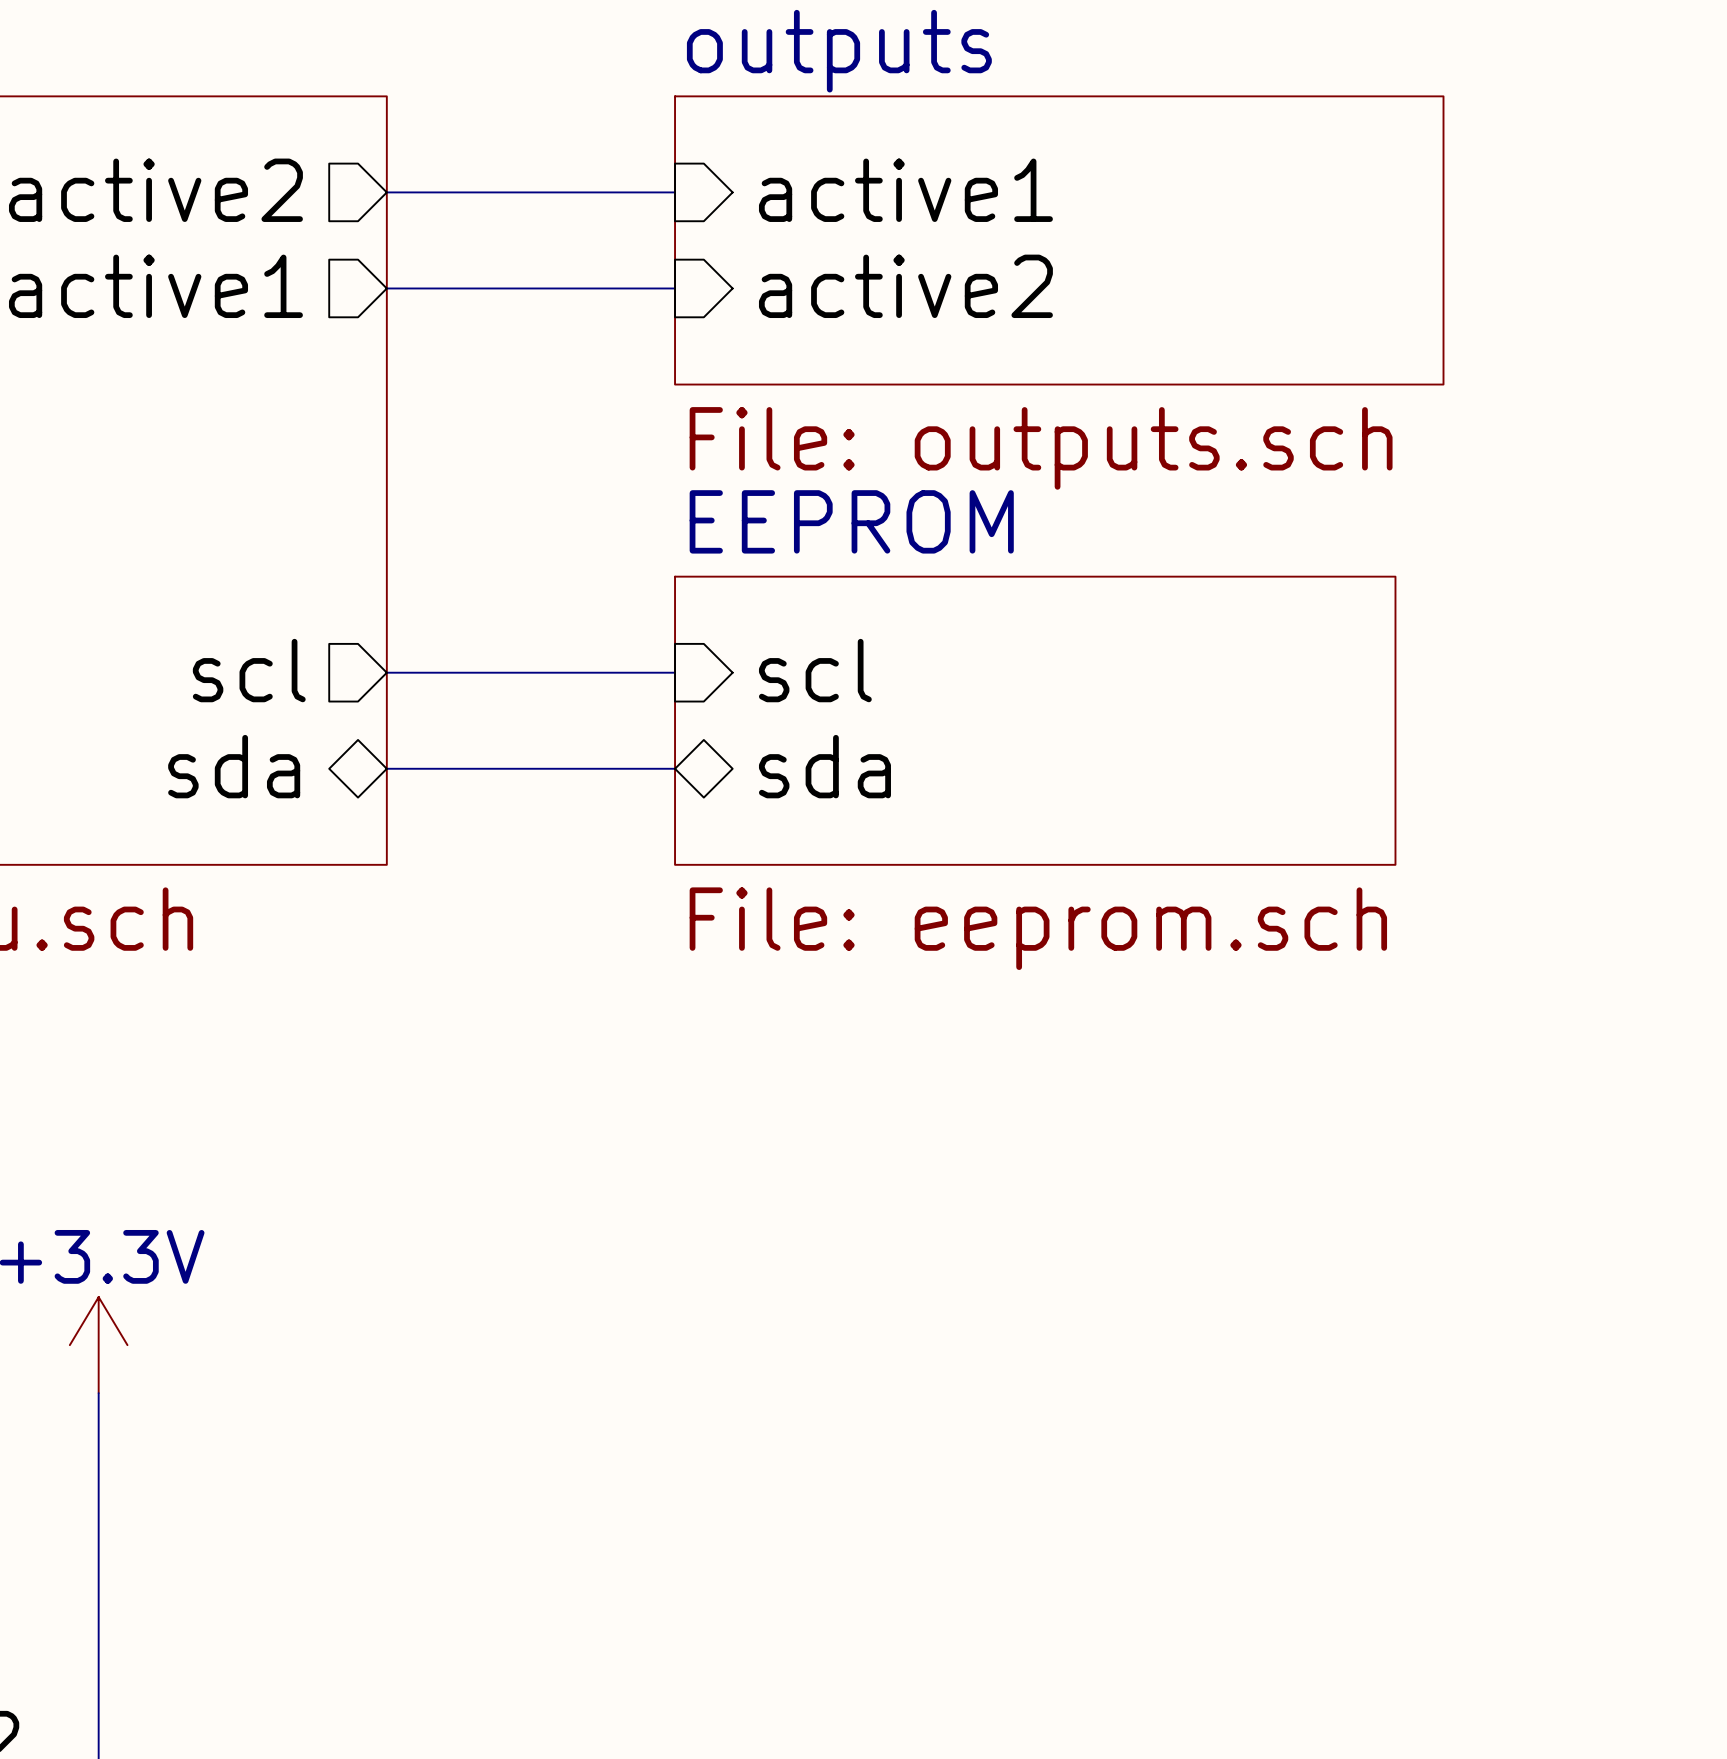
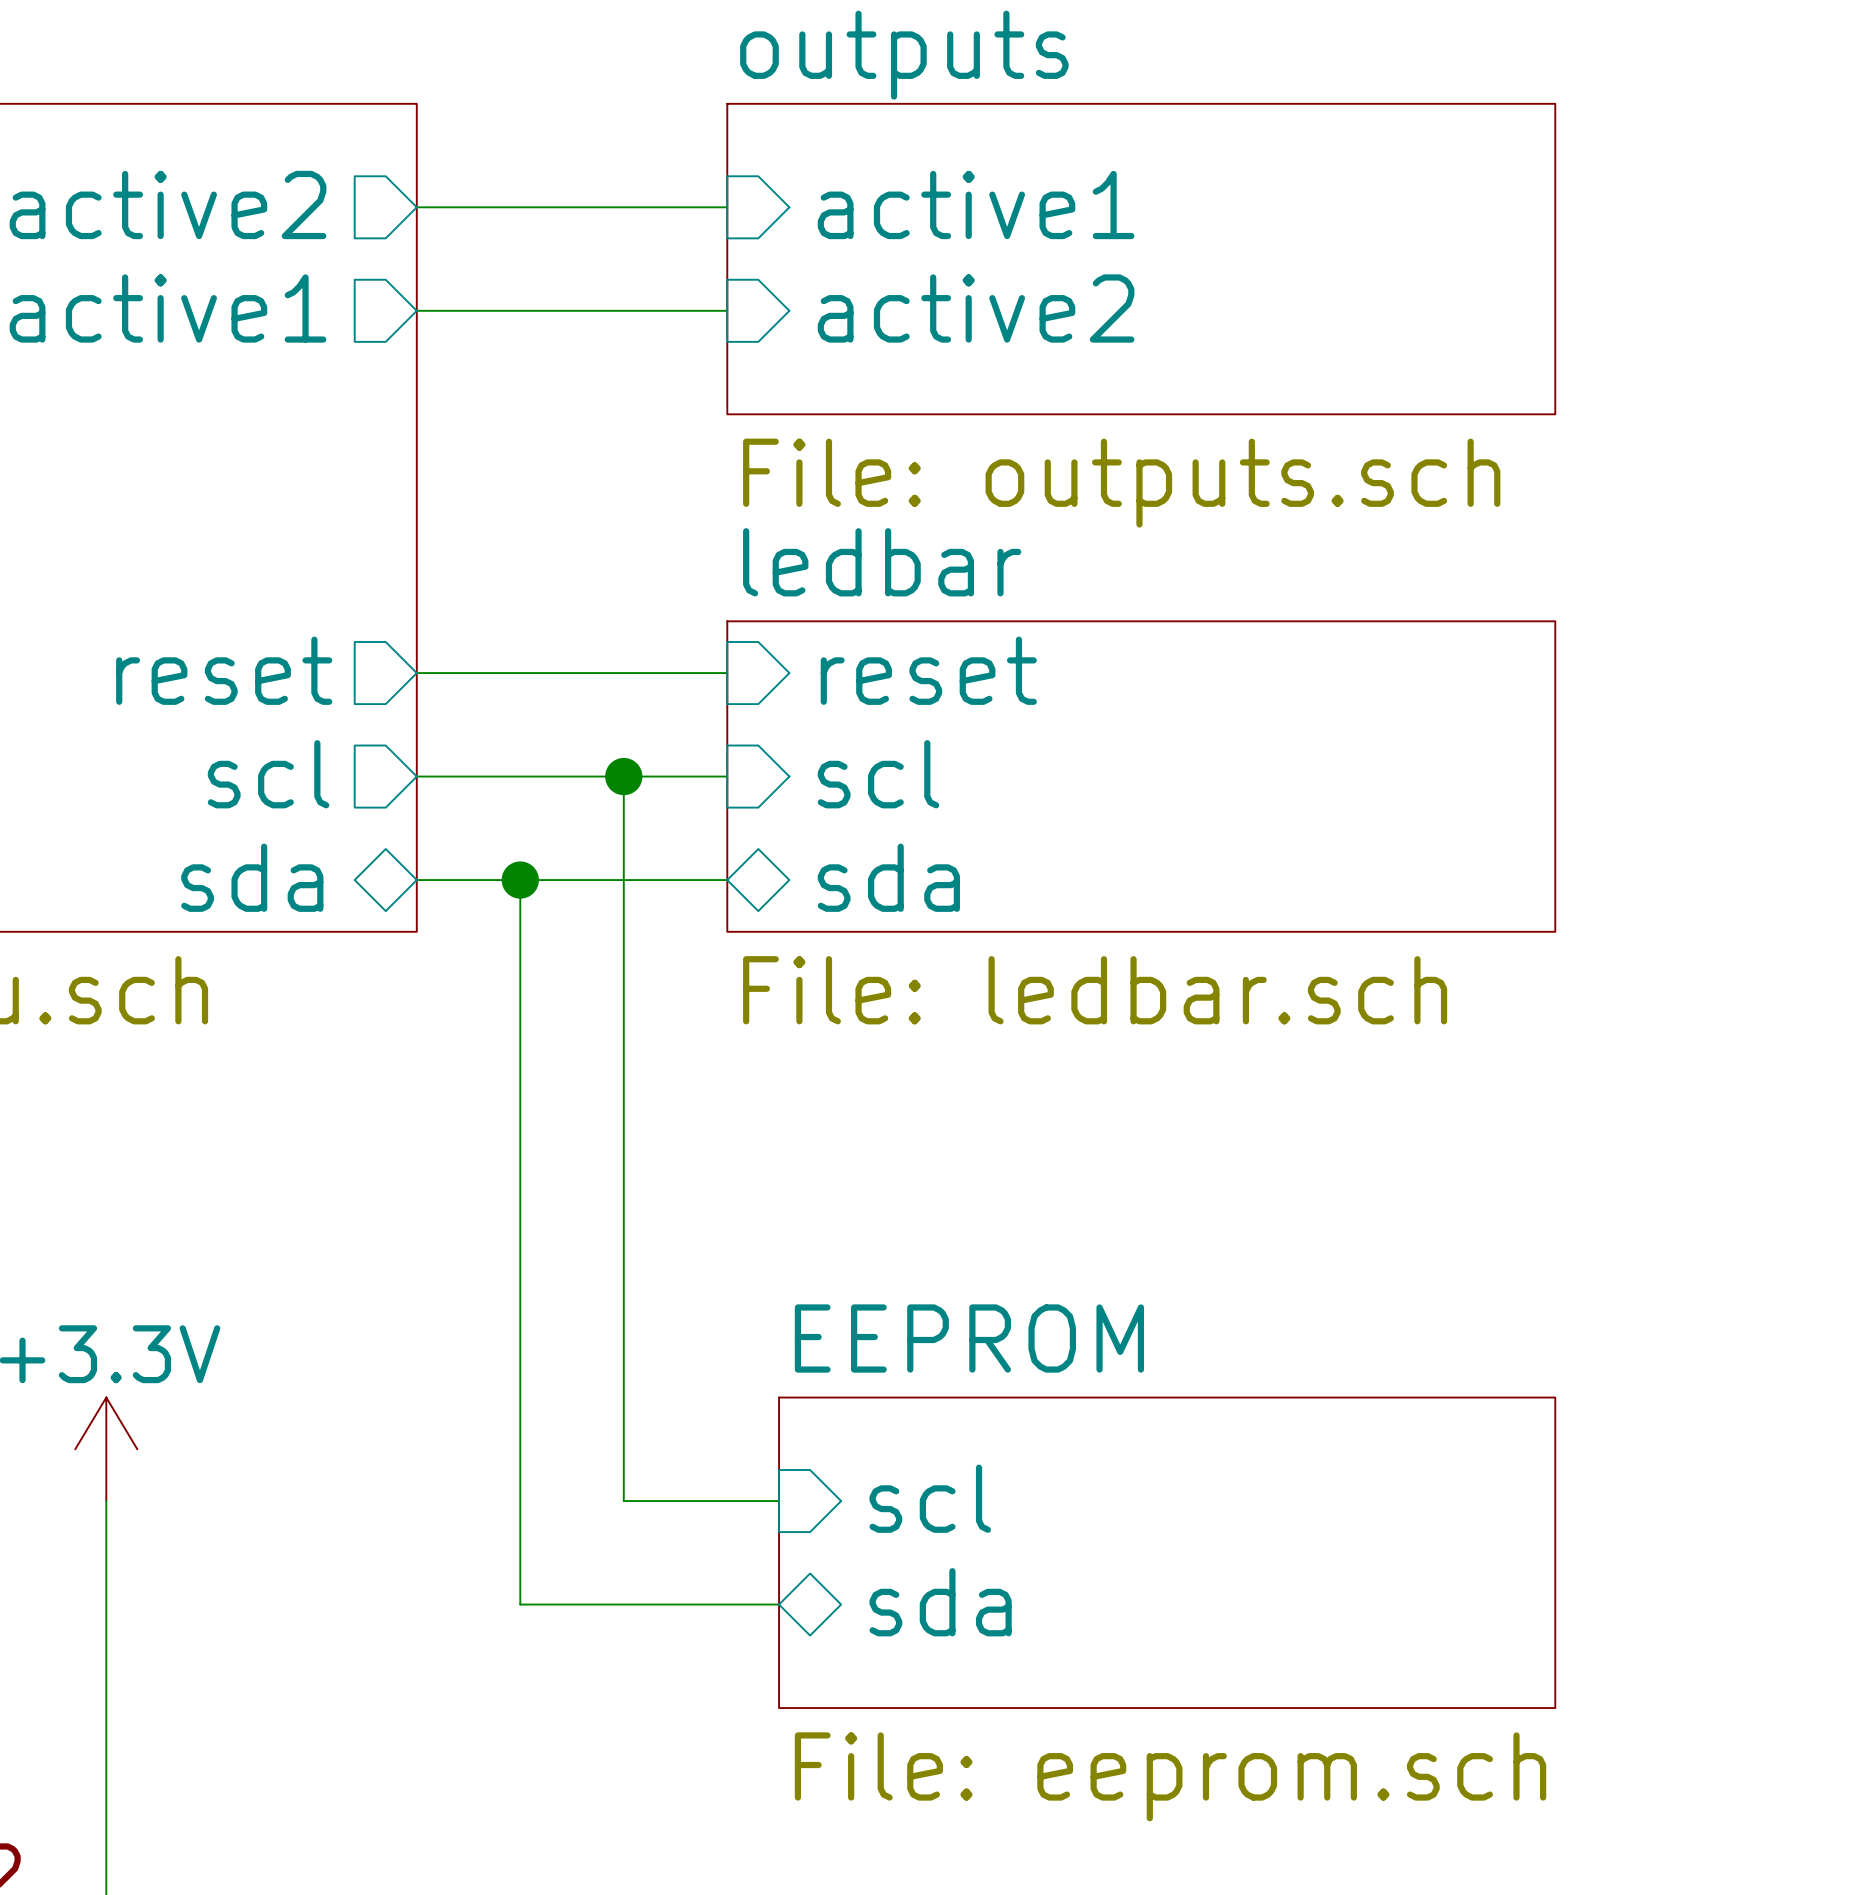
sheet pin: none -> reset (224, 670)
sheet pin: none -> reset (928, 670)
wire: none -> (416, 673) (727, 673)
sheet pin position: scl (249, 670) -> scl (268, 774)
sheet pin position: scl (815, 670) -> scl (878, 774)
wire: (386, 672) (675, 672) -> (416, 776) (727, 776)
wire: none -> (623, 776) (623, 1501) (779, 1501)
junction: none -> (623, 776)
sheet EEPROM position: (1035, 720) -> (1167, 1552)
sheet ledbar: none -> File: ledbar.sch (1141, 776)
sheet pin position: sda (234, 766) -> sda (252, 877)
sheet pin position: sda (824, 766) -> sda (888, 877)
wire: (386, 768) (675, 768) -> (416, 880) (727, 880)
wire: none -> (520, 880) (520, 1604) (779, 1604)
junction: none -> (520, 880)
sheet pin: none -> scl (930, 1498)
sheet pin: none -> sda (940, 1602)

